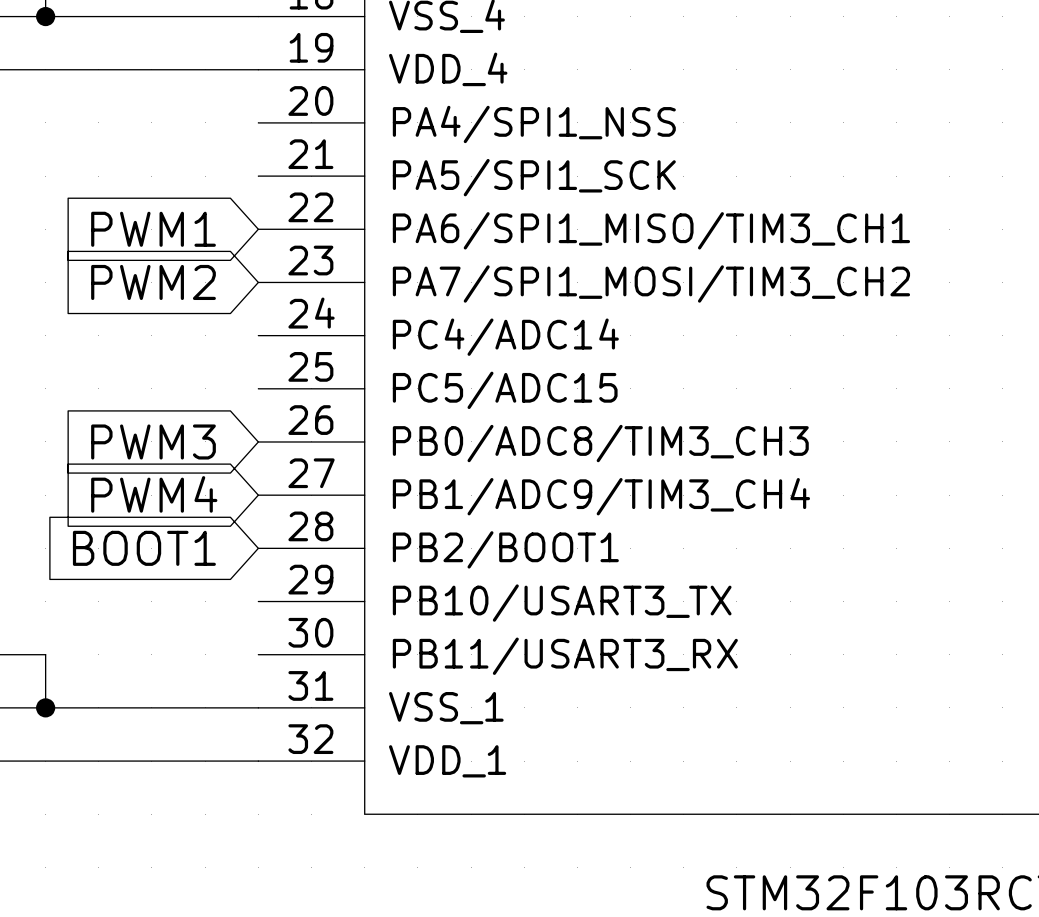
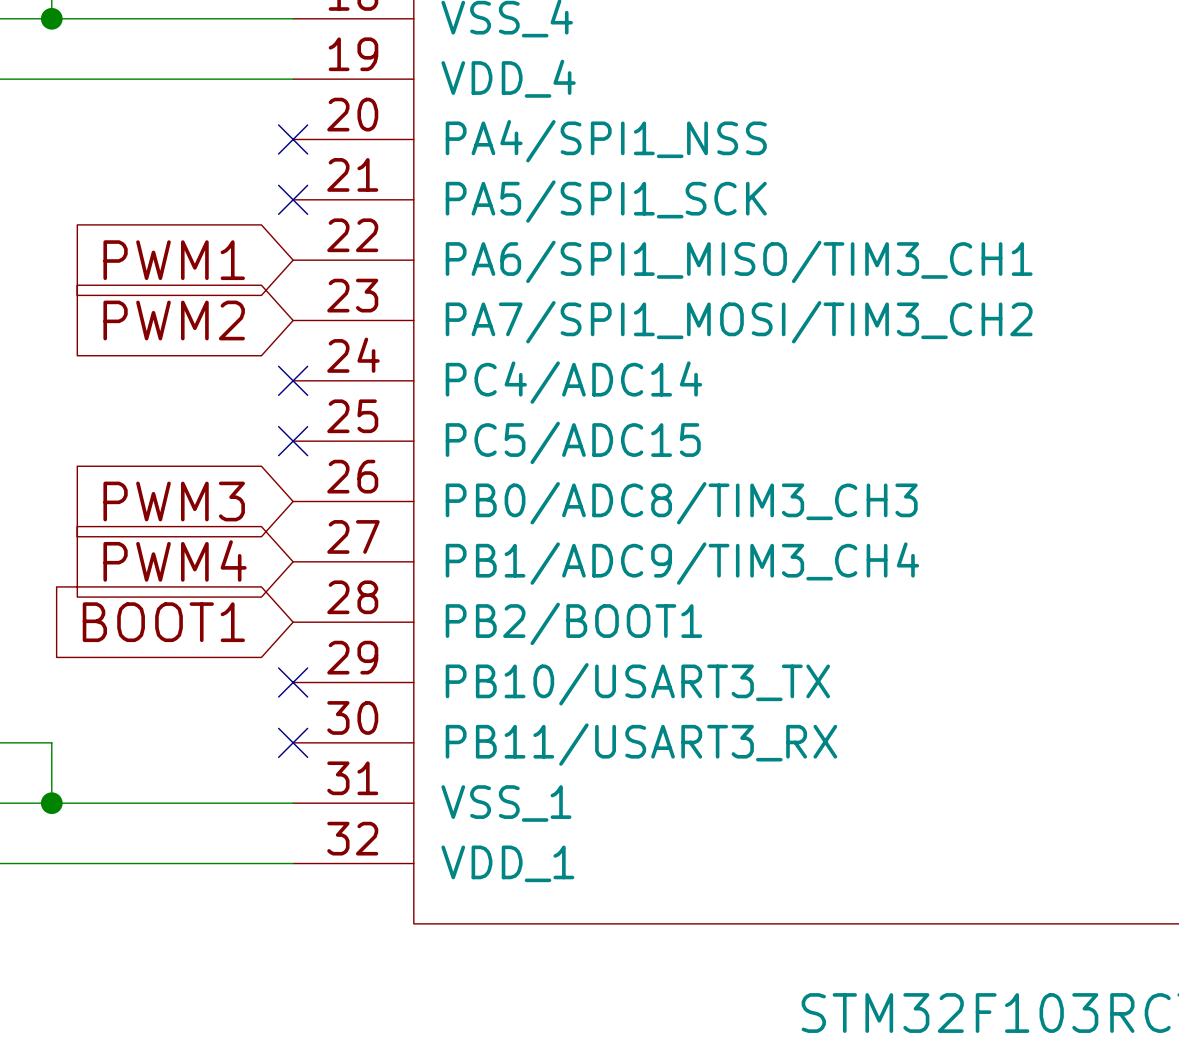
no-connect mark: none -> (293, 139)
no-connect mark: none -> (293, 199)
no-connect mark: none -> (293, 380)
no-connect mark: none -> (293, 441)
no-connect mark: none -> (293, 682)
no-connect mark: none -> (293, 742)

